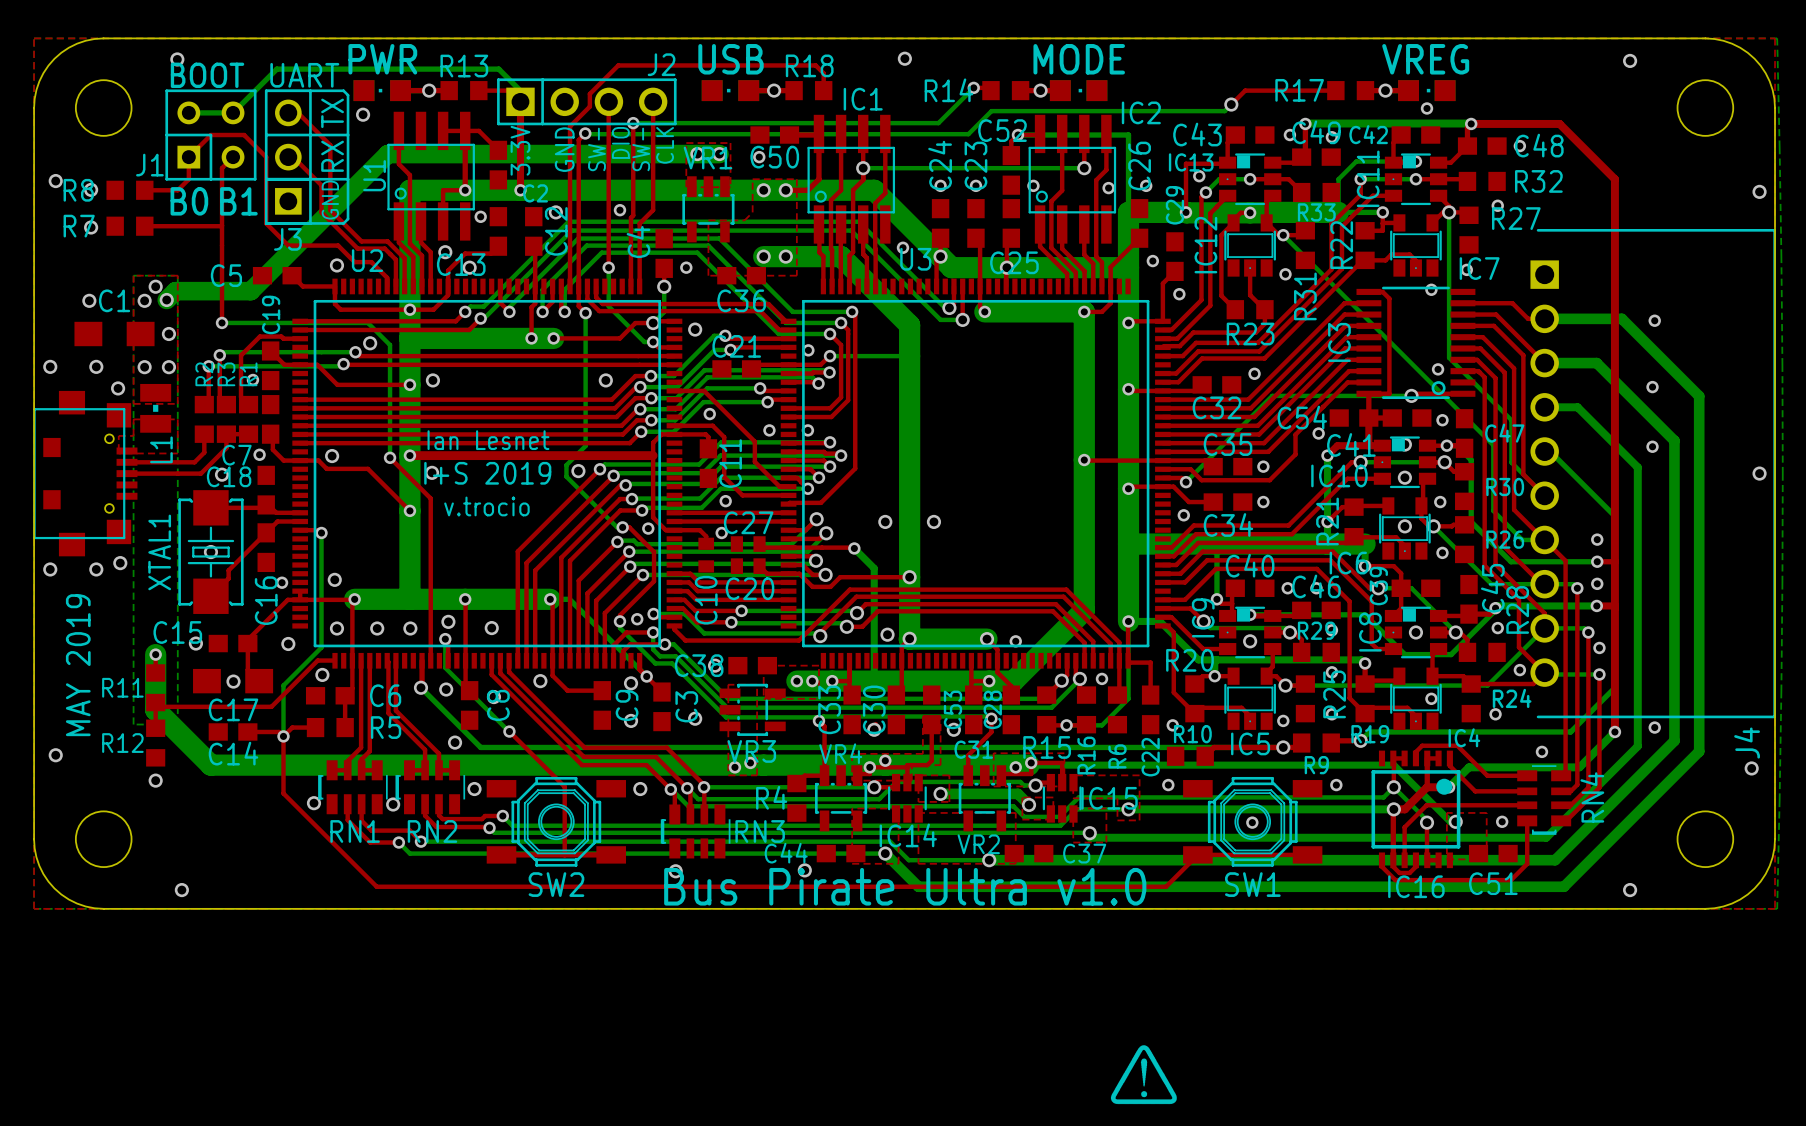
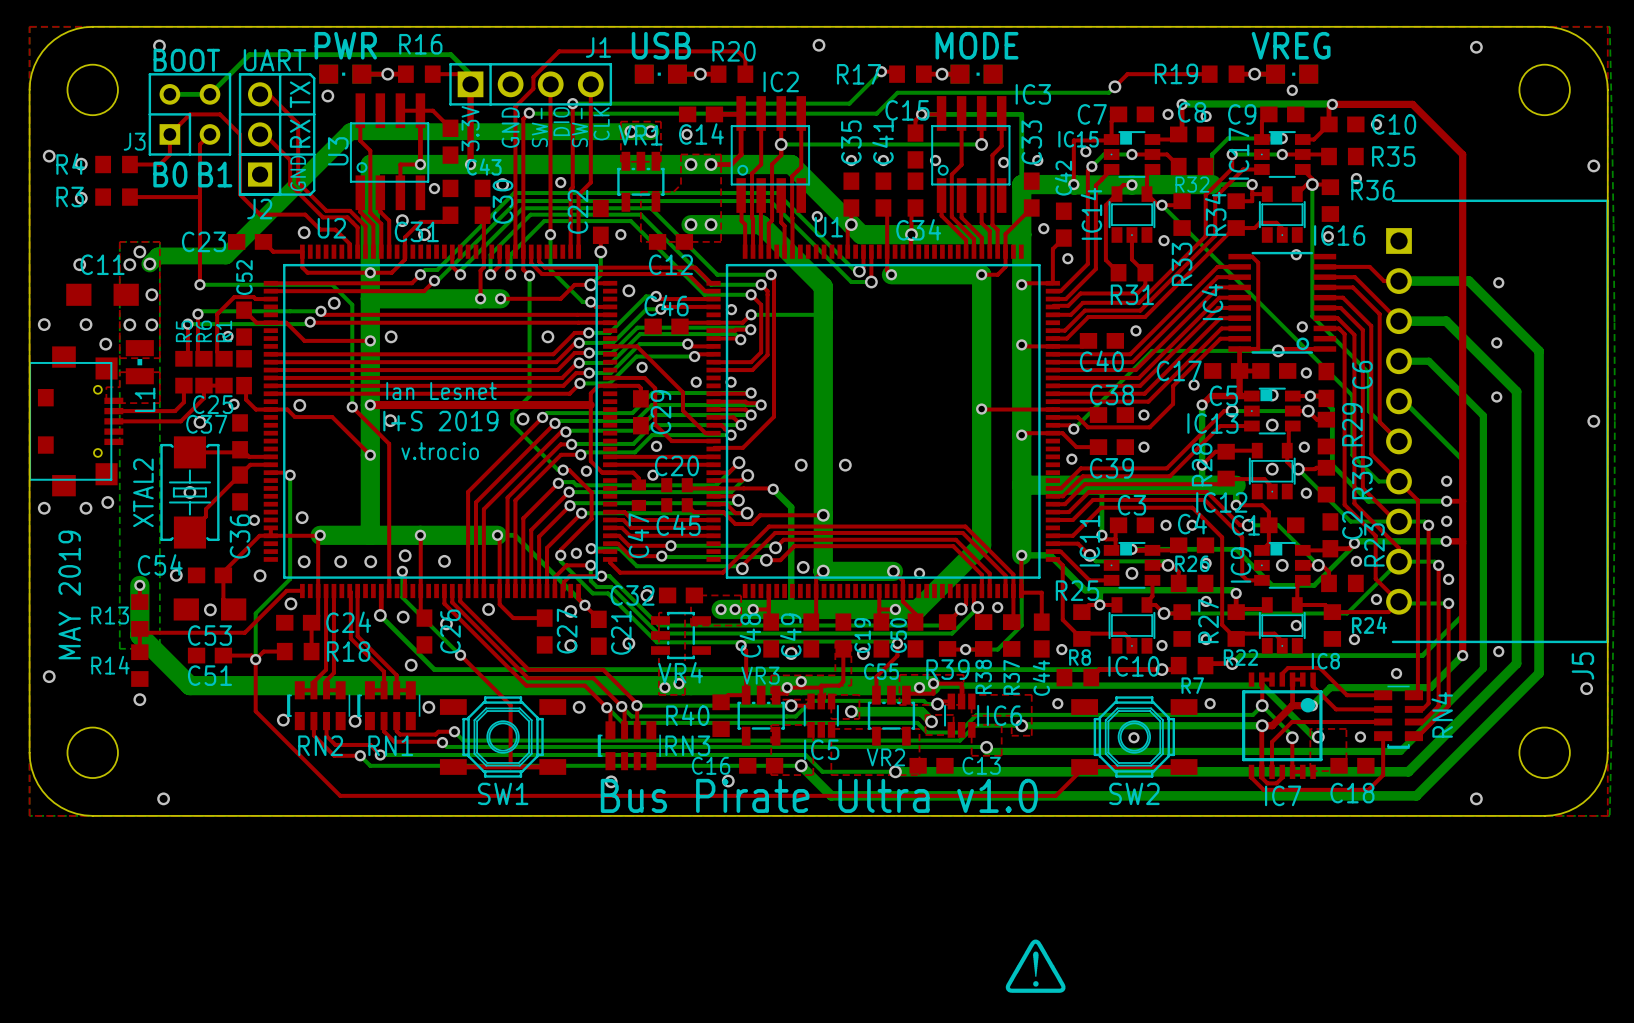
J2 name: J2 (661, 64) -> J1 (598, 47)
R18 name: R18 (809, 65) -> R20 (734, 51)
R13 name: R13 (464, 66) -> R16 (420, 44)
R14 name: R14 (948, 90) -> R17 (858, 74)
R17 name: R17 (1299, 90) -> R19 (1176, 73)
IC1 name: IC1 (863, 99) -> IC2 (781, 81)
IC2 name: IC2 (1141, 112) -> IC3 (1033, 94)
C52 name: C52 (1002, 130) -> C15 (907, 110)
C49 name: C49 (1316, 132) -> C8 (1192, 112)
C43 name: C43 (1197, 134) -> C7 (1092, 114)
C42 name: C42 (1368, 134) -> C9 (1242, 114)
C48 name: C48 (1539, 145) -> C10 (1394, 124)
C50 name: C50 (774, 157) -> C14 (701, 134)
IC13 name: IC13 (1191, 162) -> IC15 (1078, 139)
J1 name: J1 (149, 165) -> J3 (134, 141)
C24 name: C24 (940, 165) -> C35 (851, 142)
C23 name: C23 (975, 165) -> C41 (882, 142)
C26 name: C26 (1139, 165) -> C33 (1031, 142)
U1 name: U1 (374, 175) -> U3 (338, 151)
IC11 name: IC11 (1368, 178) -> IC17 (1238, 153)
R32 name: R32 (1538, 181) -> R35 (1393, 156)
R8 name: R8 (78, 190) -> R4 (70, 164)
C2 name: C2 (535, 193) -> C43 (484, 166)
C29 name: C29 (1174, 205) -> C42 (1063, 178)
R33 name: R33 (1316, 212) -> R32 (1192, 184)
R27 name: R27 (1516, 218) -> R36 (1372, 190)
R7 name: R7 (79, 226) -> R3 (70, 196)
C12 name: C12 (556, 231) -> C30 (503, 201)
J3 name: J3 (287, 239) -> J2 (259, 209)
C4 name: C4 (638, 242) -> C22 (577, 211)
IC12 name: IC12 (1205, 245) -> IC14 (1091, 213)
R22 name: R22 (1341, 245) -> R34 (1215, 213)
U3 name: U3 (915, 259) -> U1 (828, 227)
C25 name: C25 (1014, 262) -> C34 (918, 229)
C13 name: C13 (461, 264) -> C31 (416, 231)
IC7 name: IC7 (1479, 268) -> IC16 (1339, 235)
C5 name: C5 (226, 275) -> C23 (203, 241)
R31 name: R31 (1305, 296) -> R33 (1182, 264)
C1 name: C1 (114, 300) -> C11 (102, 264)
C36 name: C36 (741, 300) -> C12 (670, 264)
C19 name: C19 (271, 314) -> C52 (244, 277)
R23 name: R23 (1250, 334) -> R31 (1132, 294)
IC3 name: IC3 (1339, 342) -> IC4 (1212, 302)
C21 name: C21 (736, 346) -> C46 (666, 305)
R2 name: R2 (204, 374) -> R5 (183, 331)
R3 name: R3 (226, 374) -> R6 (203, 331)
C32 name: C32 (1216, 407) -> C40 (1101, 361)
C54 name: C54 (1302, 417) -> C17 (1179, 370)
C47 name: C47 (1504, 433) -> C6 (1362, 374)
C35 name: C35 (1228, 444) -> C38 (1111, 395)
C41 name: C41 (1351, 444) -> C5 (1223, 395)
C7 name: C7 (236, 455) -> C25 (213, 404)
C11 name: C11 (730, 463) -> C29 (660, 412)
IC10 name: IC10 (1339, 475) -> IC13 (1212, 423)
C18 name: C18 (229, 476) -> C37 (206, 424)
R30 name: R30 (1505, 487) -> R29 (1352, 424)
R21 name: R21 (1327, 521) -> R28 (1202, 464)
C27 name: C27 (748, 522) -> C20 (676, 465)
C34 name: C34 (1228, 524) -> C39 (1111, 468)
R26 name: R26 (1505, 539) -> R30 (1362, 477)
XTAL1 name: XTAL1 (159, 552) -> XTAL2 (143, 492)
IC6 name: IC6 (1349, 563) -> IC12 (1221, 502)
C40 name: C40 (1250, 565) -> C3 (1131, 505)
C46 name: C46 (1316, 586) -> C4 (1192, 523)
C39 name: C39 (1378, 586) -> C1 (1245, 525)
C20 name: C20 (749, 588) -> C45 (678, 525)
C45 name: C45 (1492, 588) -> C2 (1352, 525)
C16 name: C16 (266, 600) -> C36 (240, 536)
C10 name: C10 (706, 600) -> C47 (638, 535)
R28 name: R28 (1517, 609) -> R23 (1374, 544)
IC9 name: IC9 (1203, 617) -> IC11 (1089, 540)
R29 name: R29 (1316, 630) -> R26 (1192, 563)
C15 name: C15 (177, 632) -> C54 (160, 564)
IC8 name: IC8 (1370, 632) -> IC9 (1241, 564)
R20 name: R20 (1189, 660) -> R25 (1077, 590)
C38 name: C38 (699, 665) -> C32 (632, 595)
R11 name: R11 (122, 687) -> R13 (110, 615)
R25 name: R25 (1334, 694) -> R27 (1208, 621)
C6 name: C6 (385, 695) -> C24 (348, 622)
C8 name: C8 (498, 705) -> C26 (450, 631)
C9 name: C9 (627, 705) -> C27 (567, 631)
C3 name: C3 (686, 706) -> C21 (621, 632)
C17 name: C17 (233, 709) -> C53 (209, 635)
C33 name: C33 (829, 709) -> C48 (750, 635)
C30 name: C30 (874, 709) -> C49 (790, 635)
C53 name: C53 (952, 709) -> C19 (862, 635)
C28 name: C28 (992, 709) -> C50 (898, 635)
R5 name: R5 (386, 727) -> R18 (348, 651)
R10 name: R10 (1192, 734) -> R8 (1080, 657)
R19 name: R19 (1370, 734) -> R22 (1240, 657)
IC4 name: IC4 (1464, 737) -> IC8 (1325, 661)
R12 name: R12 (122, 743) -> R14 (110, 665)
IC5 name: IC5 (1250, 743) -> IC10 (1133, 666)
J4 name: J4 (1747, 743) -> J5 (1582, 666)
R15 name: R15 (1047, 747) -> R39 (947, 669)
C31 name: C31 (973, 749) -> C55 (881, 671)
VR3 name: VR3 (751, 751) -> VR4 (680, 672)
C14 name: C14 (233, 753) -> C51 (209, 675)
VR4 name: VR4 (840, 753) -> VR3 (760, 675)
R16 name: R16 (1086, 755) -> R38 (983, 676)
R6 name: R6 (1117, 756) -> R37 (1011, 677)
C22 name: C22 (1150, 757) -> C44 (1041, 678)
R9 name: R9 (1316, 765) -> R7 (1192, 685)
R4 name: R4 (771, 797) -> R40 (687, 715)
IC15 name: IC15 (1109, 798) -> IC6 (1004, 715)
RN1 name: RN1 (355, 831) -> RN2 (320, 745)
RN2 name: RN2 (432, 831) -> RN1 (390, 745)
IC14 name: IC14 (908, 835) -> IC5 (821, 749)
C44 name: C44 (786, 853) -> C16 (711, 765)
C37 name: C37 (1084, 853) -> C13 (981, 765)
C51 name: C51 (1493, 883) -> C18 (1352, 793)
SW2 name: SW2 (556, 884) -> SW1 (503, 793)
SW1 name: SW1 (1252, 884) -> SW2 (1134, 793)
IC16 name: IC16 (1416, 886) -> IC7 (1283, 795)

